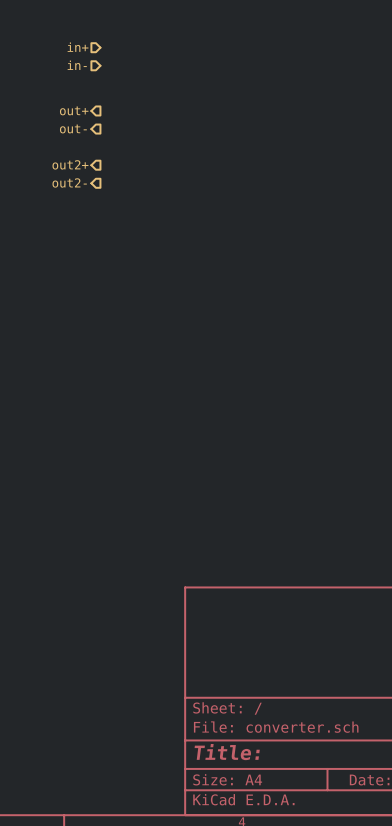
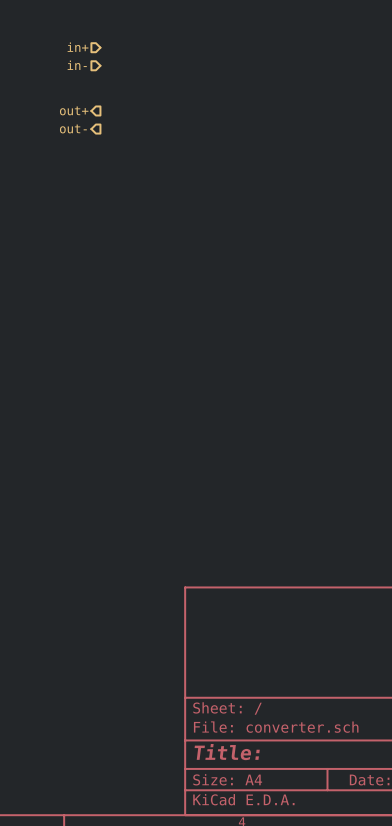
hierarchical label: out2+ (70, 164) -> none
hierarchical label: out2- (69, 182) -> none

